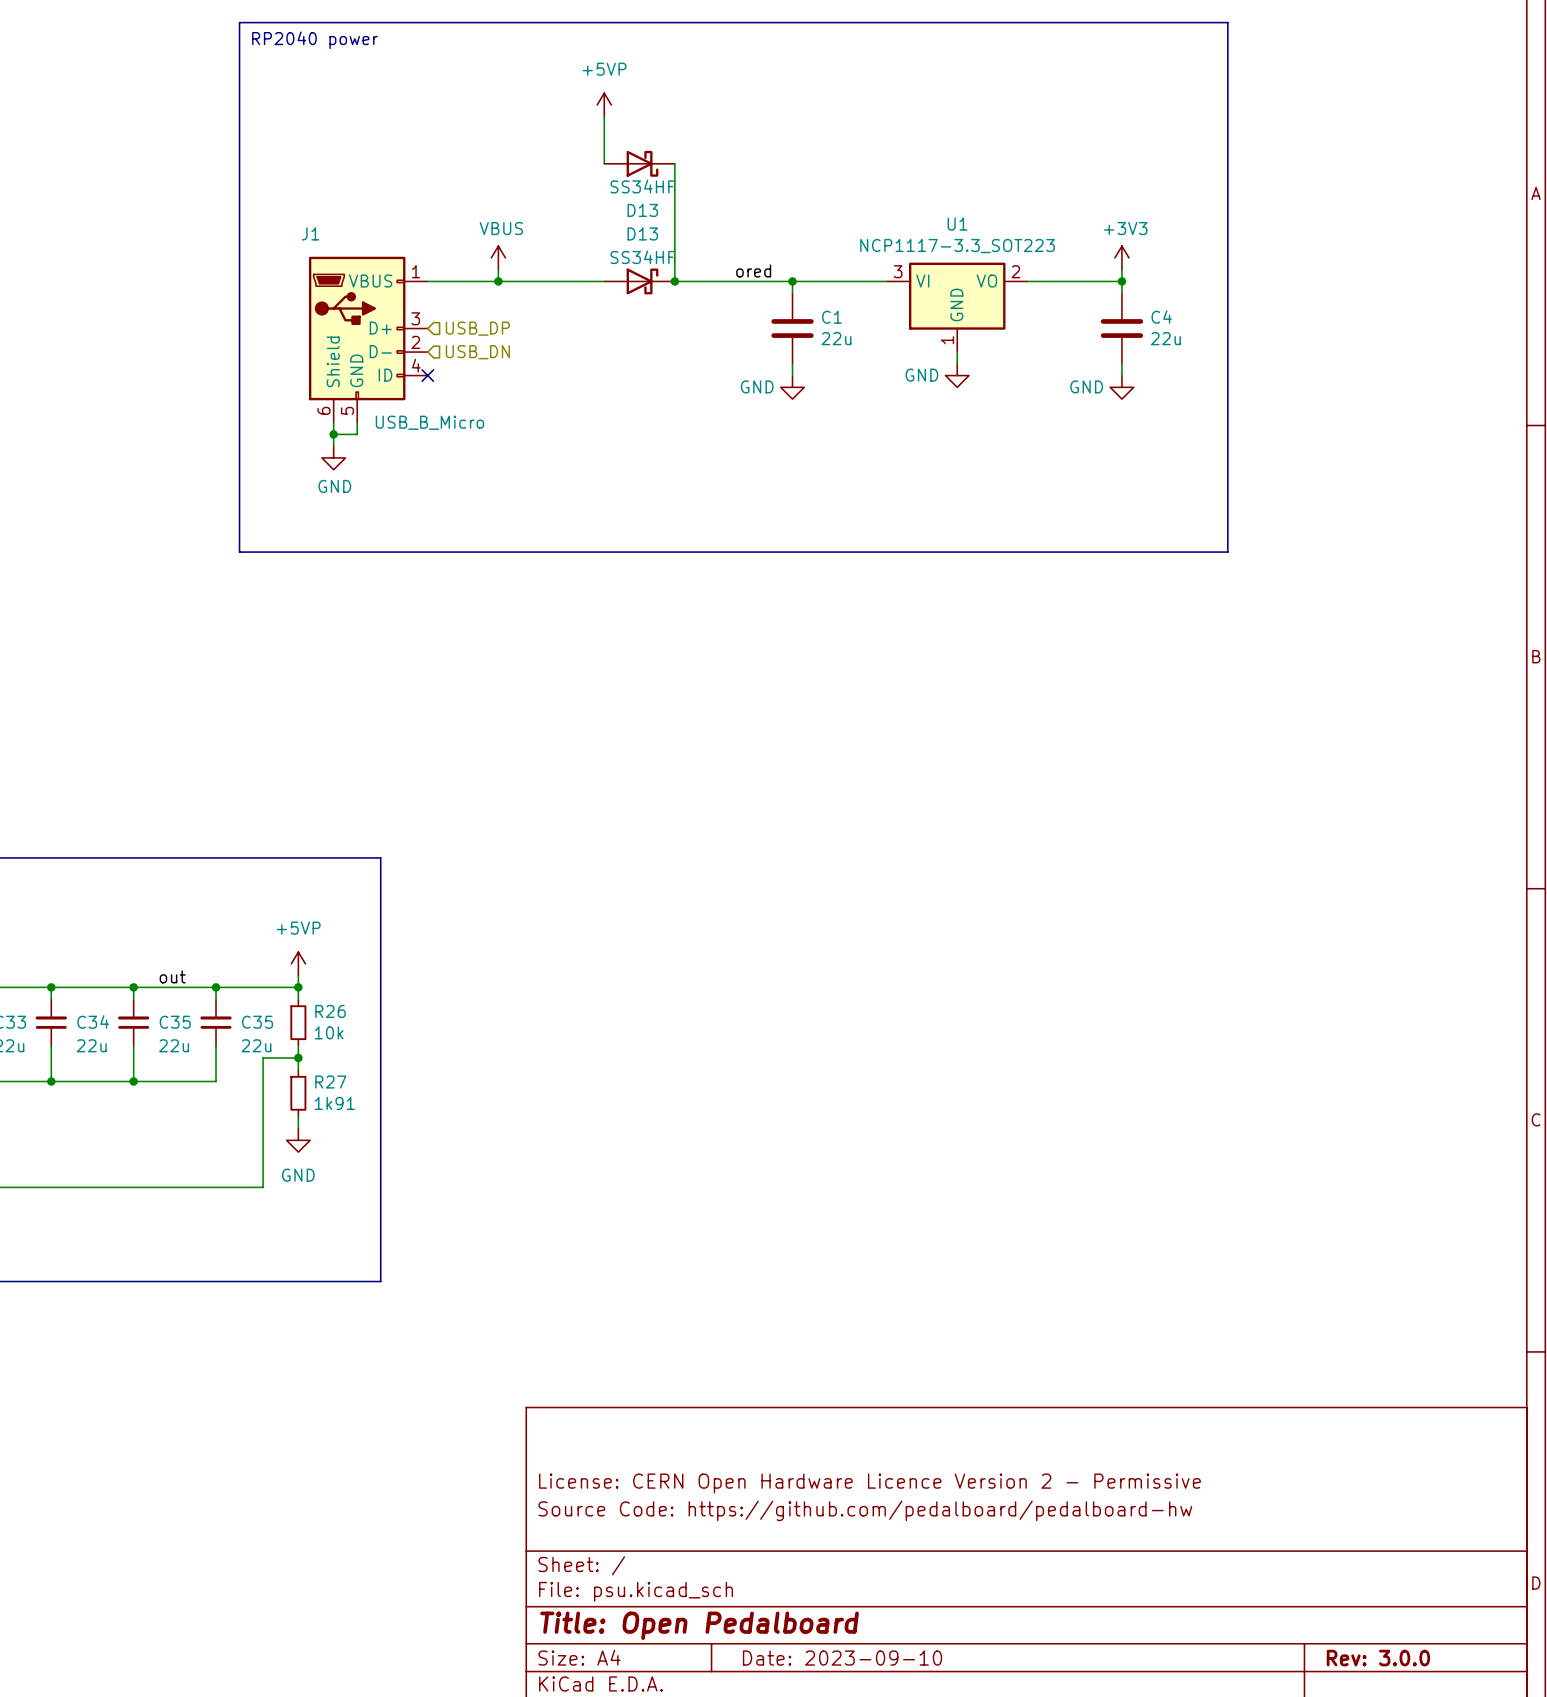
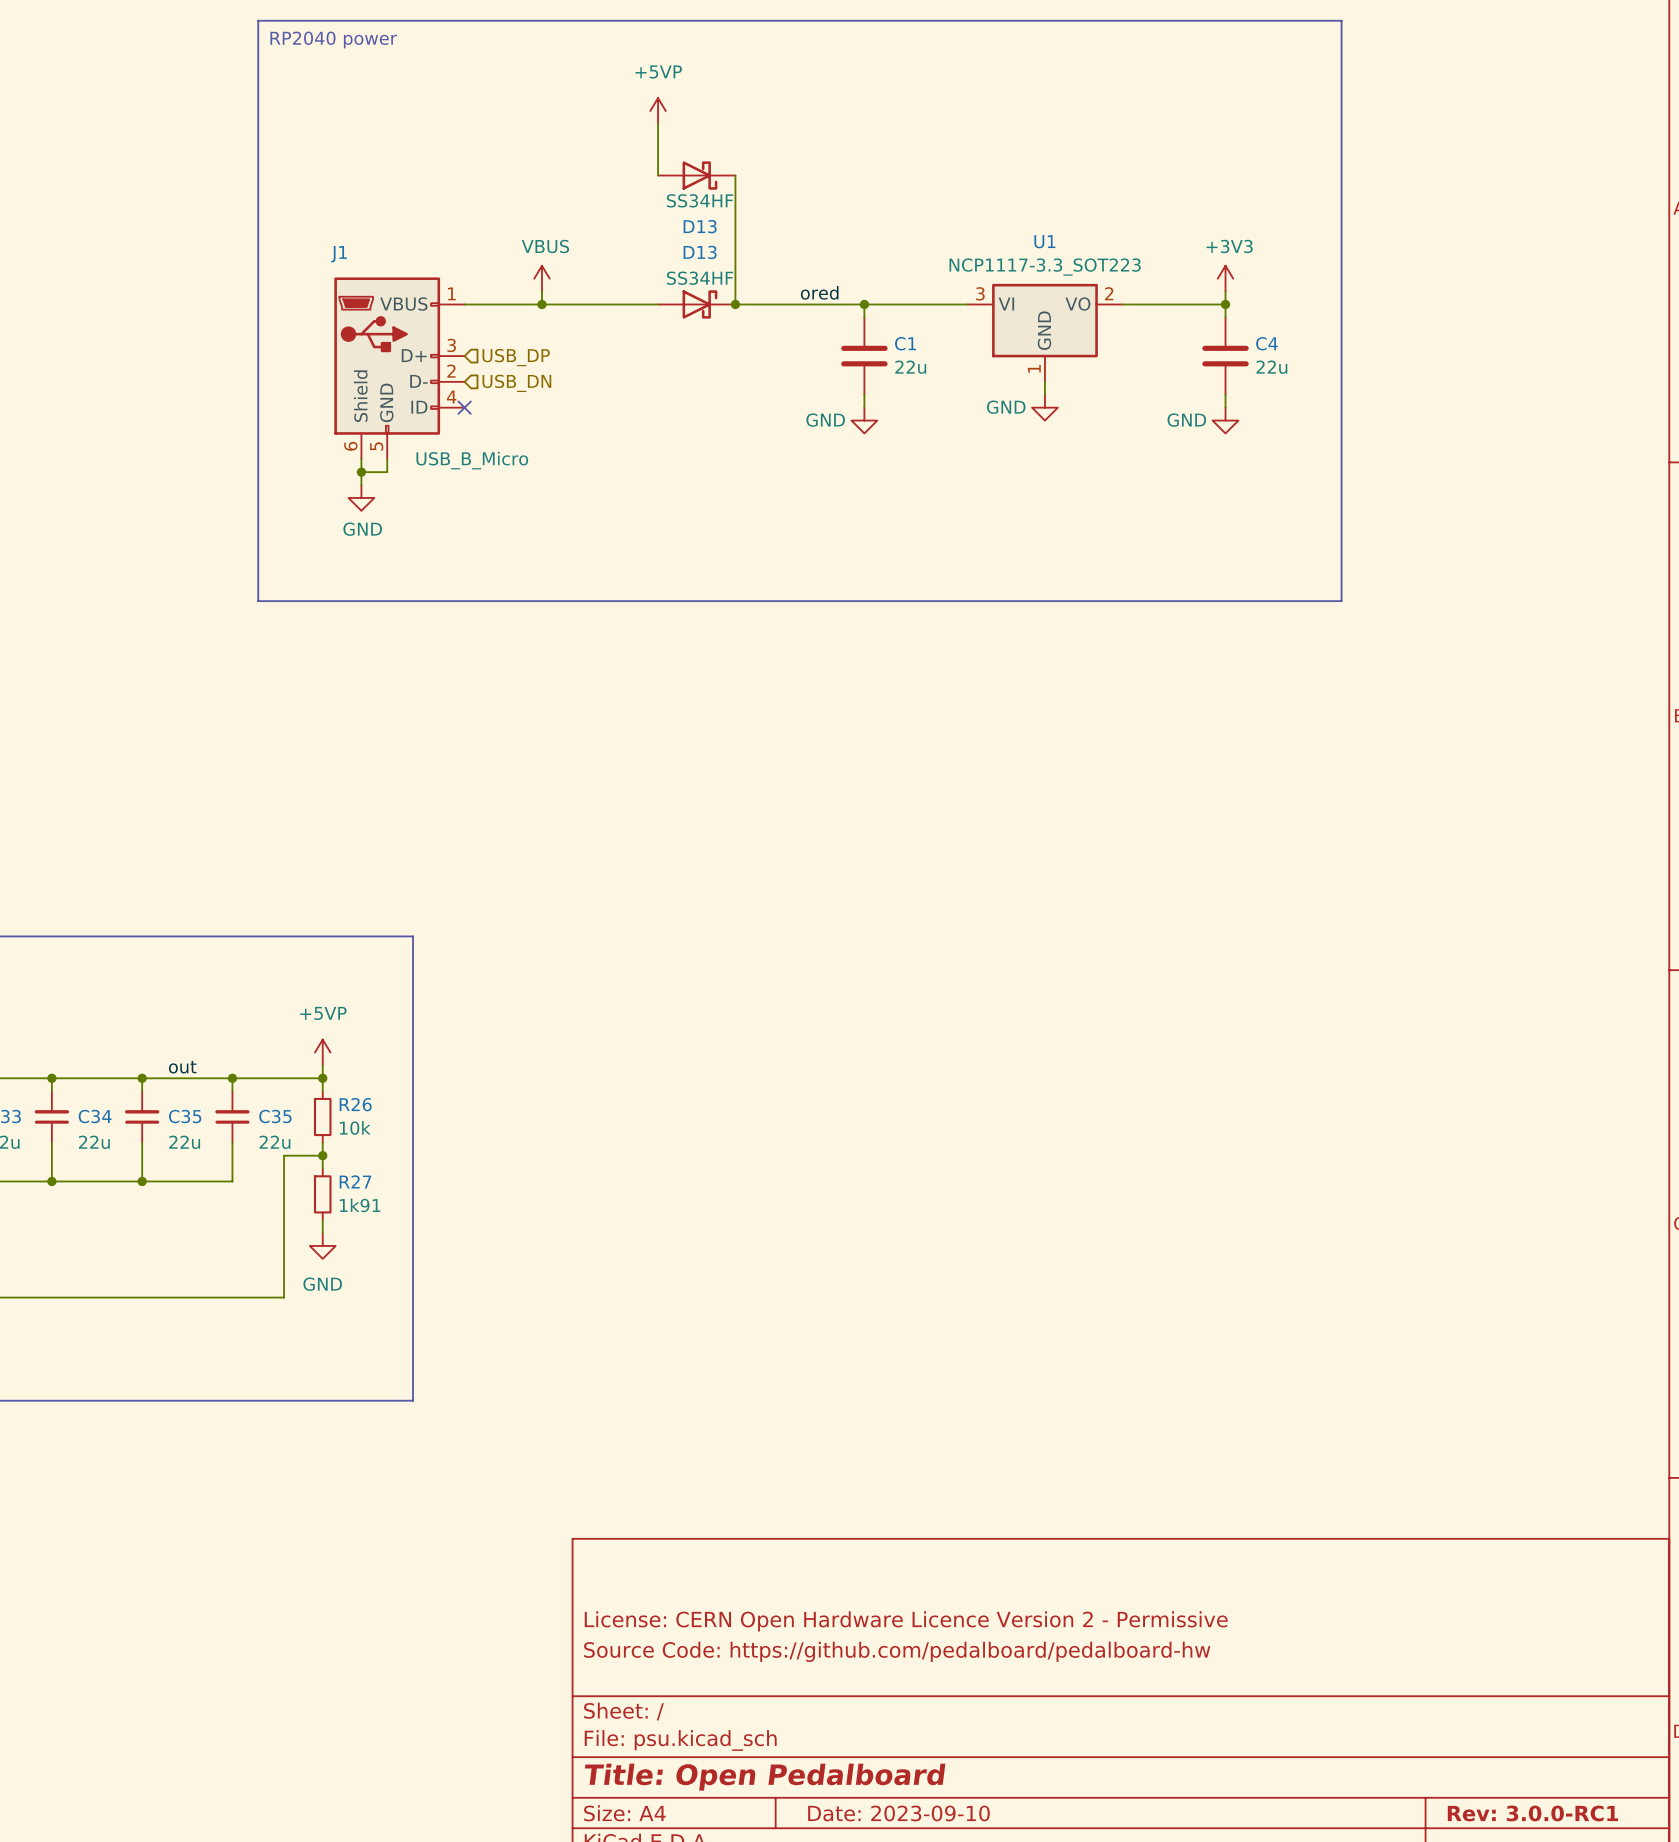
title block: Rev: 3.0.0 (1378, 1658) -> Rev: 3.0.0-RC1 (1532, 1813)

